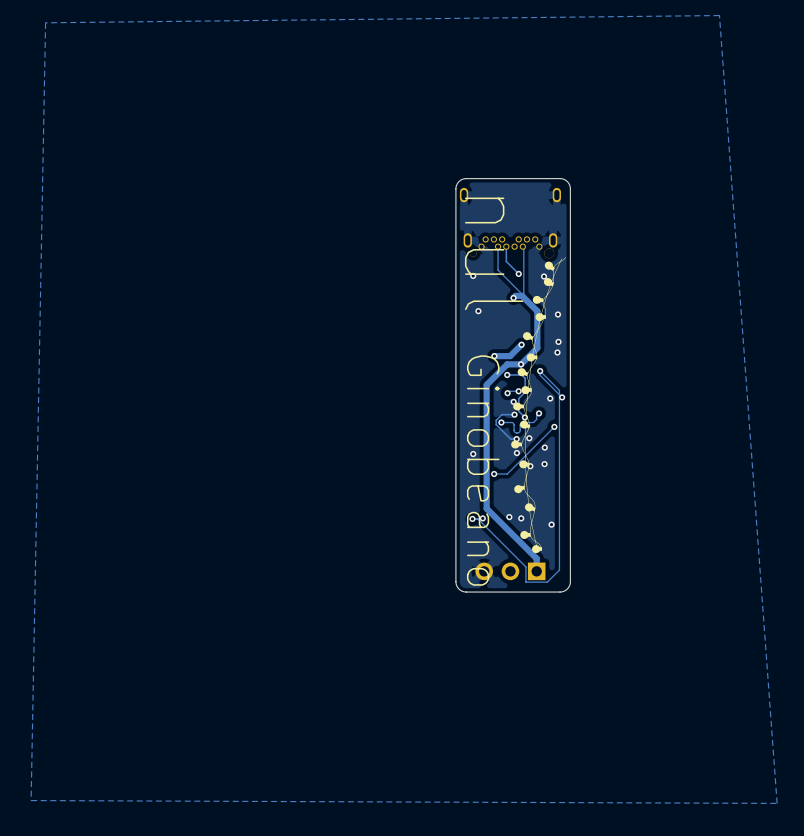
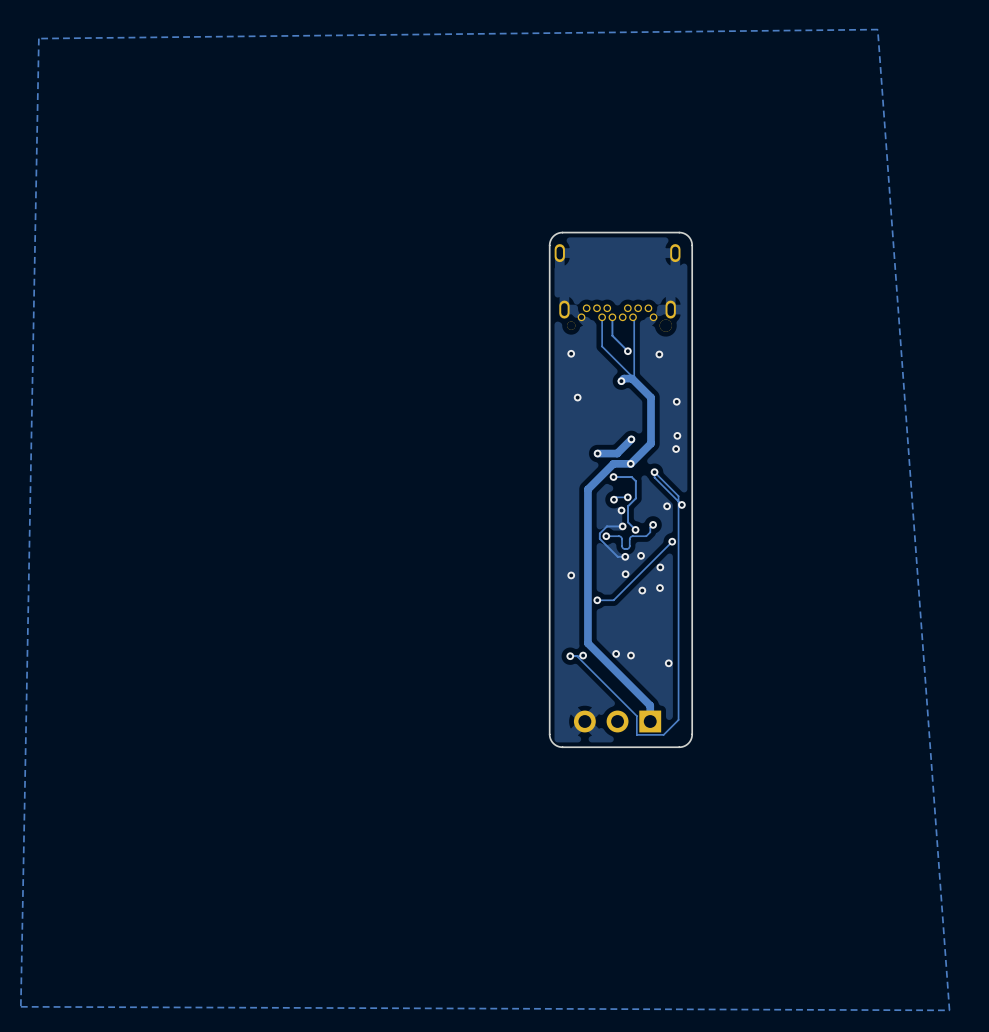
text: nul (494, 253) -> none
drawing: [511, 257, 566, 554] -> none
text: Ginobeano (483, 470) -> none

